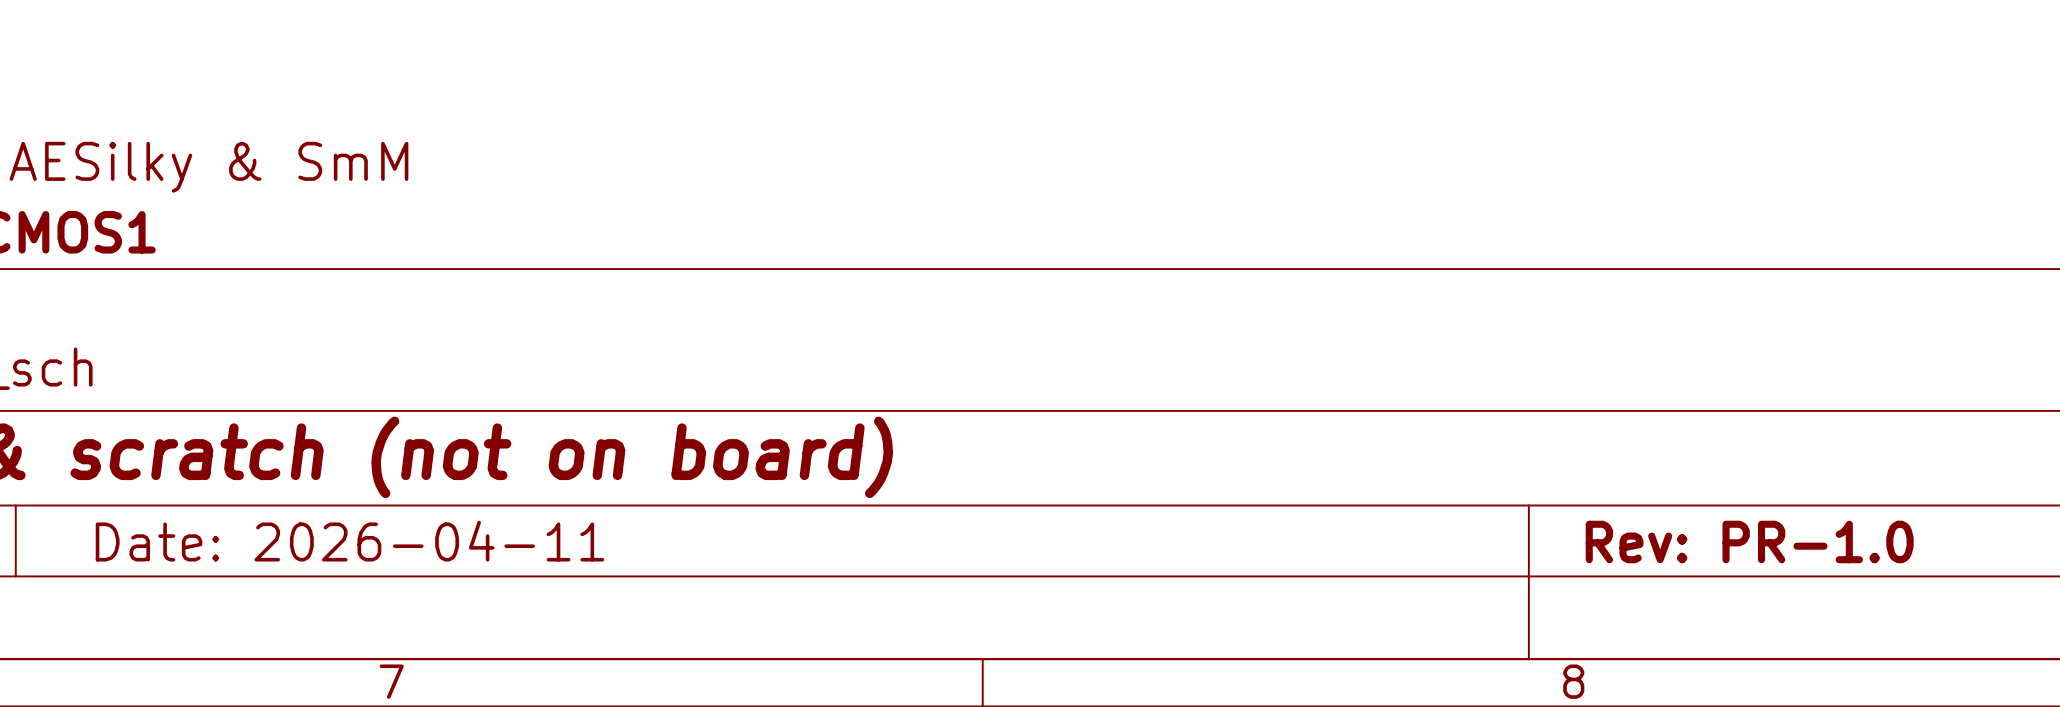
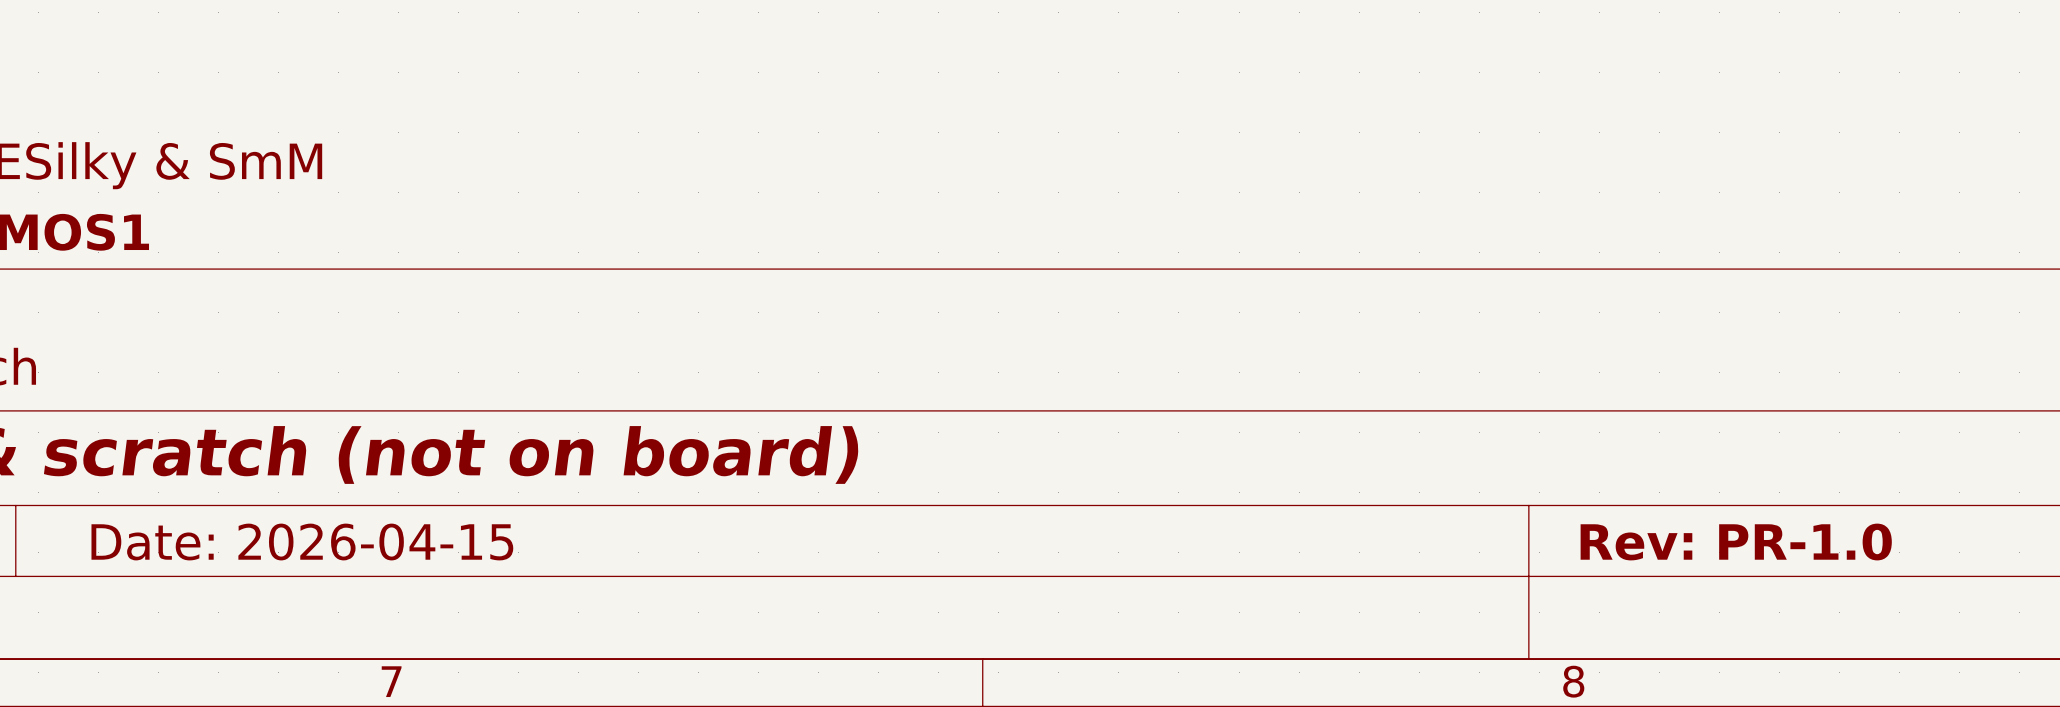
title block: Date: 2026-04-11 (349, 541) -> Date: 2026-04-15 (302, 542)

